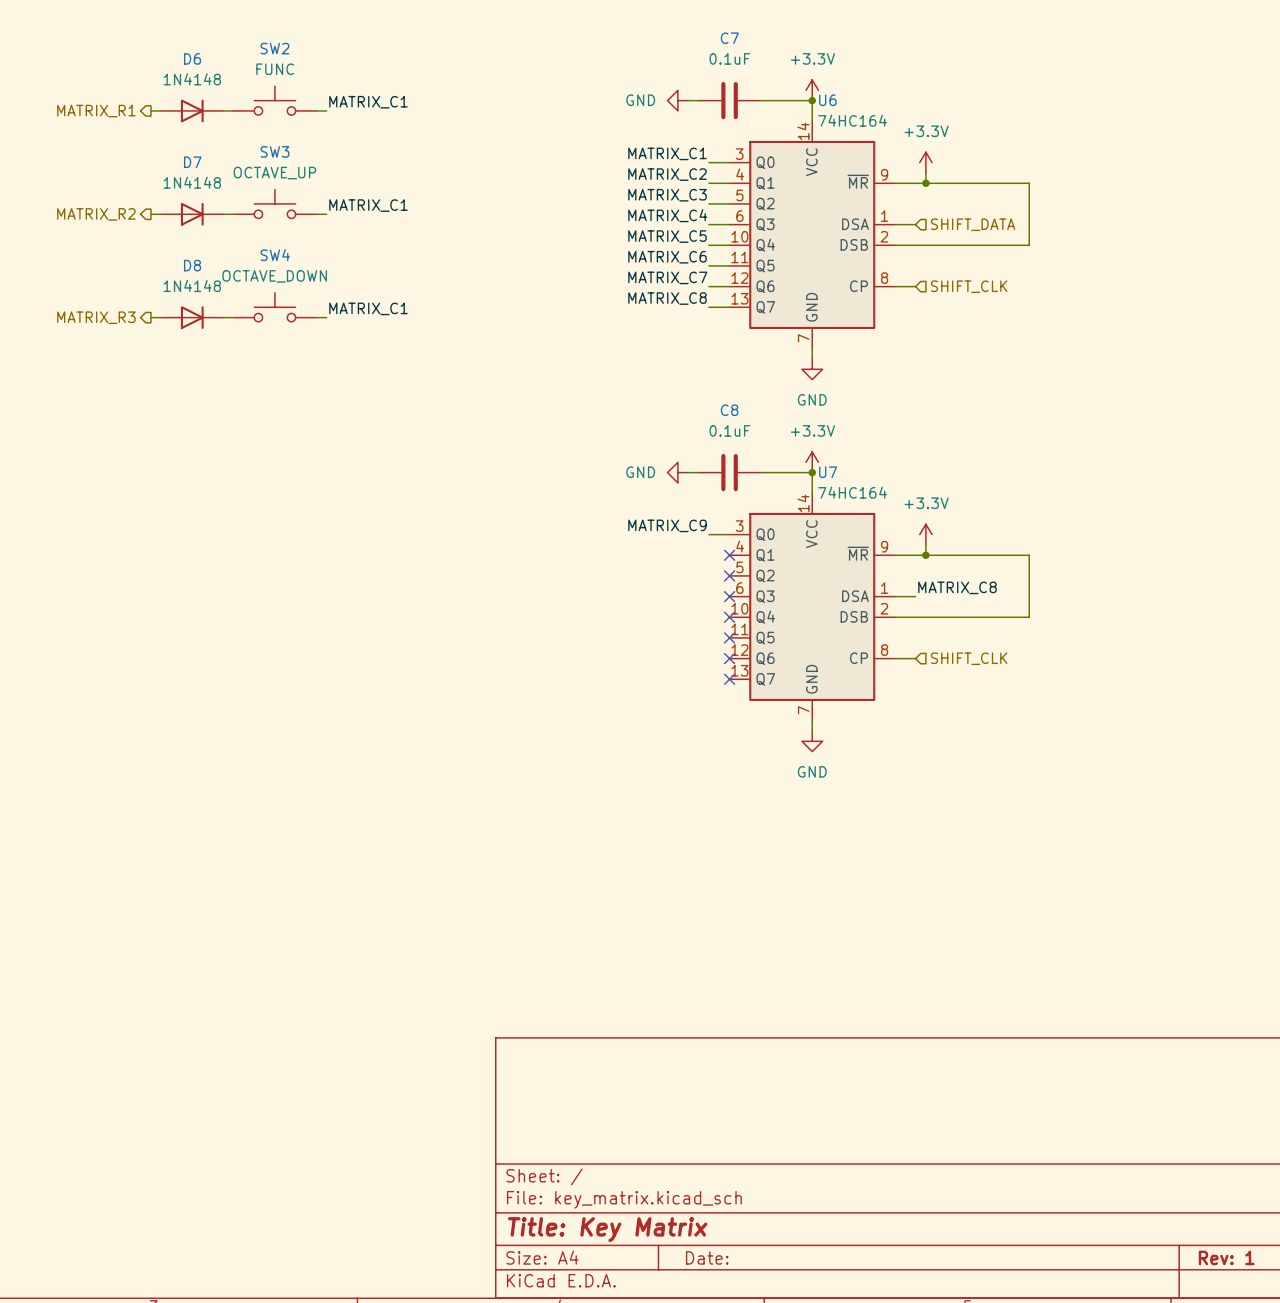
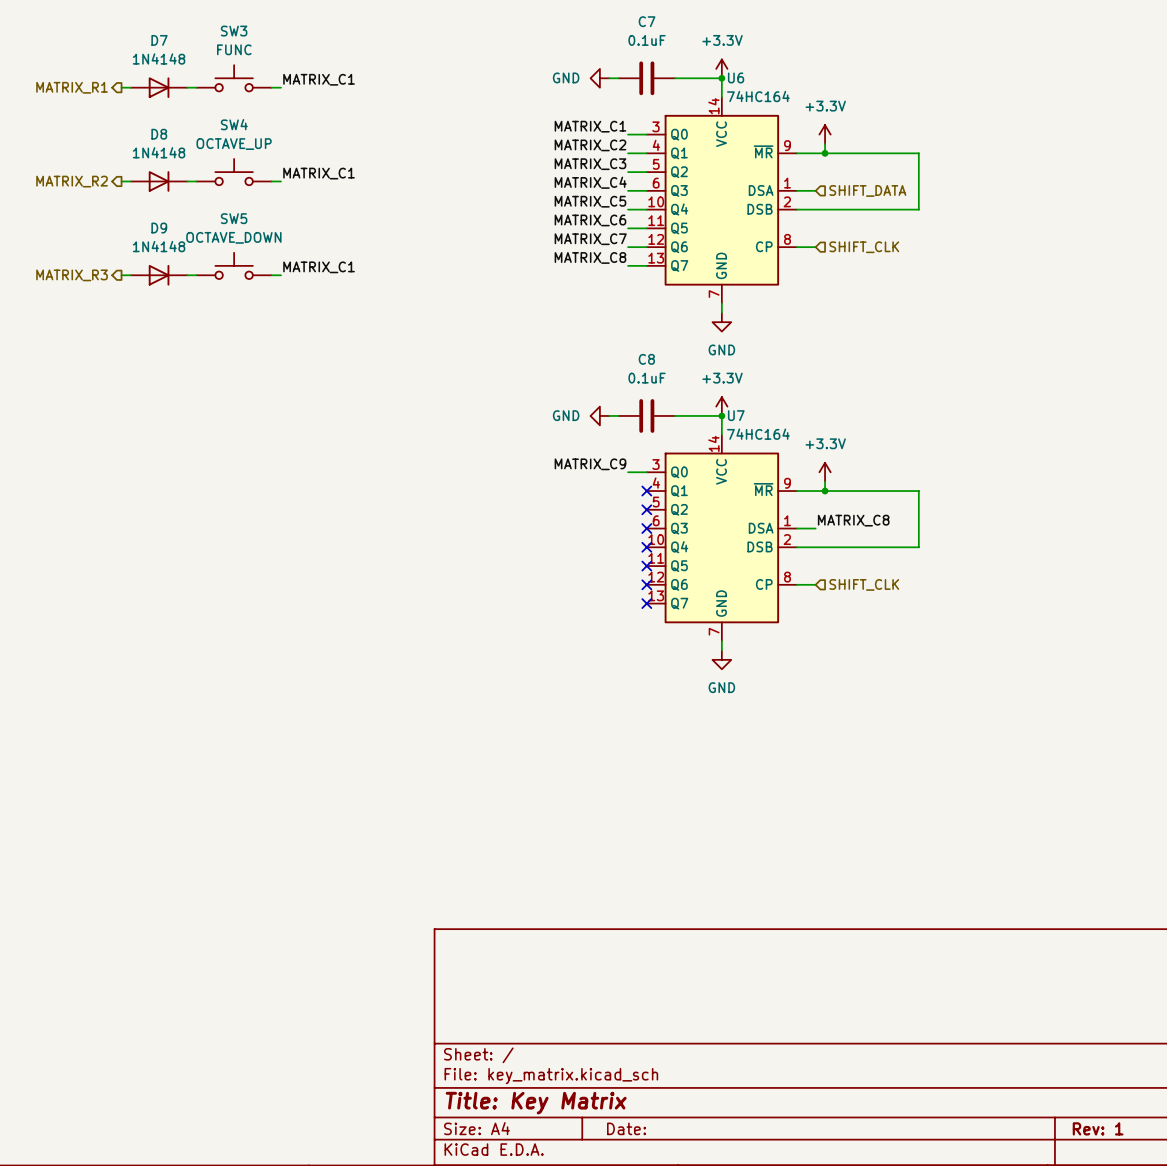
SW2 name: SW2 (274, 48) -> SW3 (234, 31)
D6 name: D6 (192, 58) -> D7 (159, 40)
SW3 name: SW3 (274, 151) -> SW4 (234, 124)
D7 name: D7 (192, 162) -> D8 (159, 134)
SW4 name: SW4 (275, 254) -> SW5 (234, 218)
D8 name: D8 (192, 265) -> D9 (159, 228)

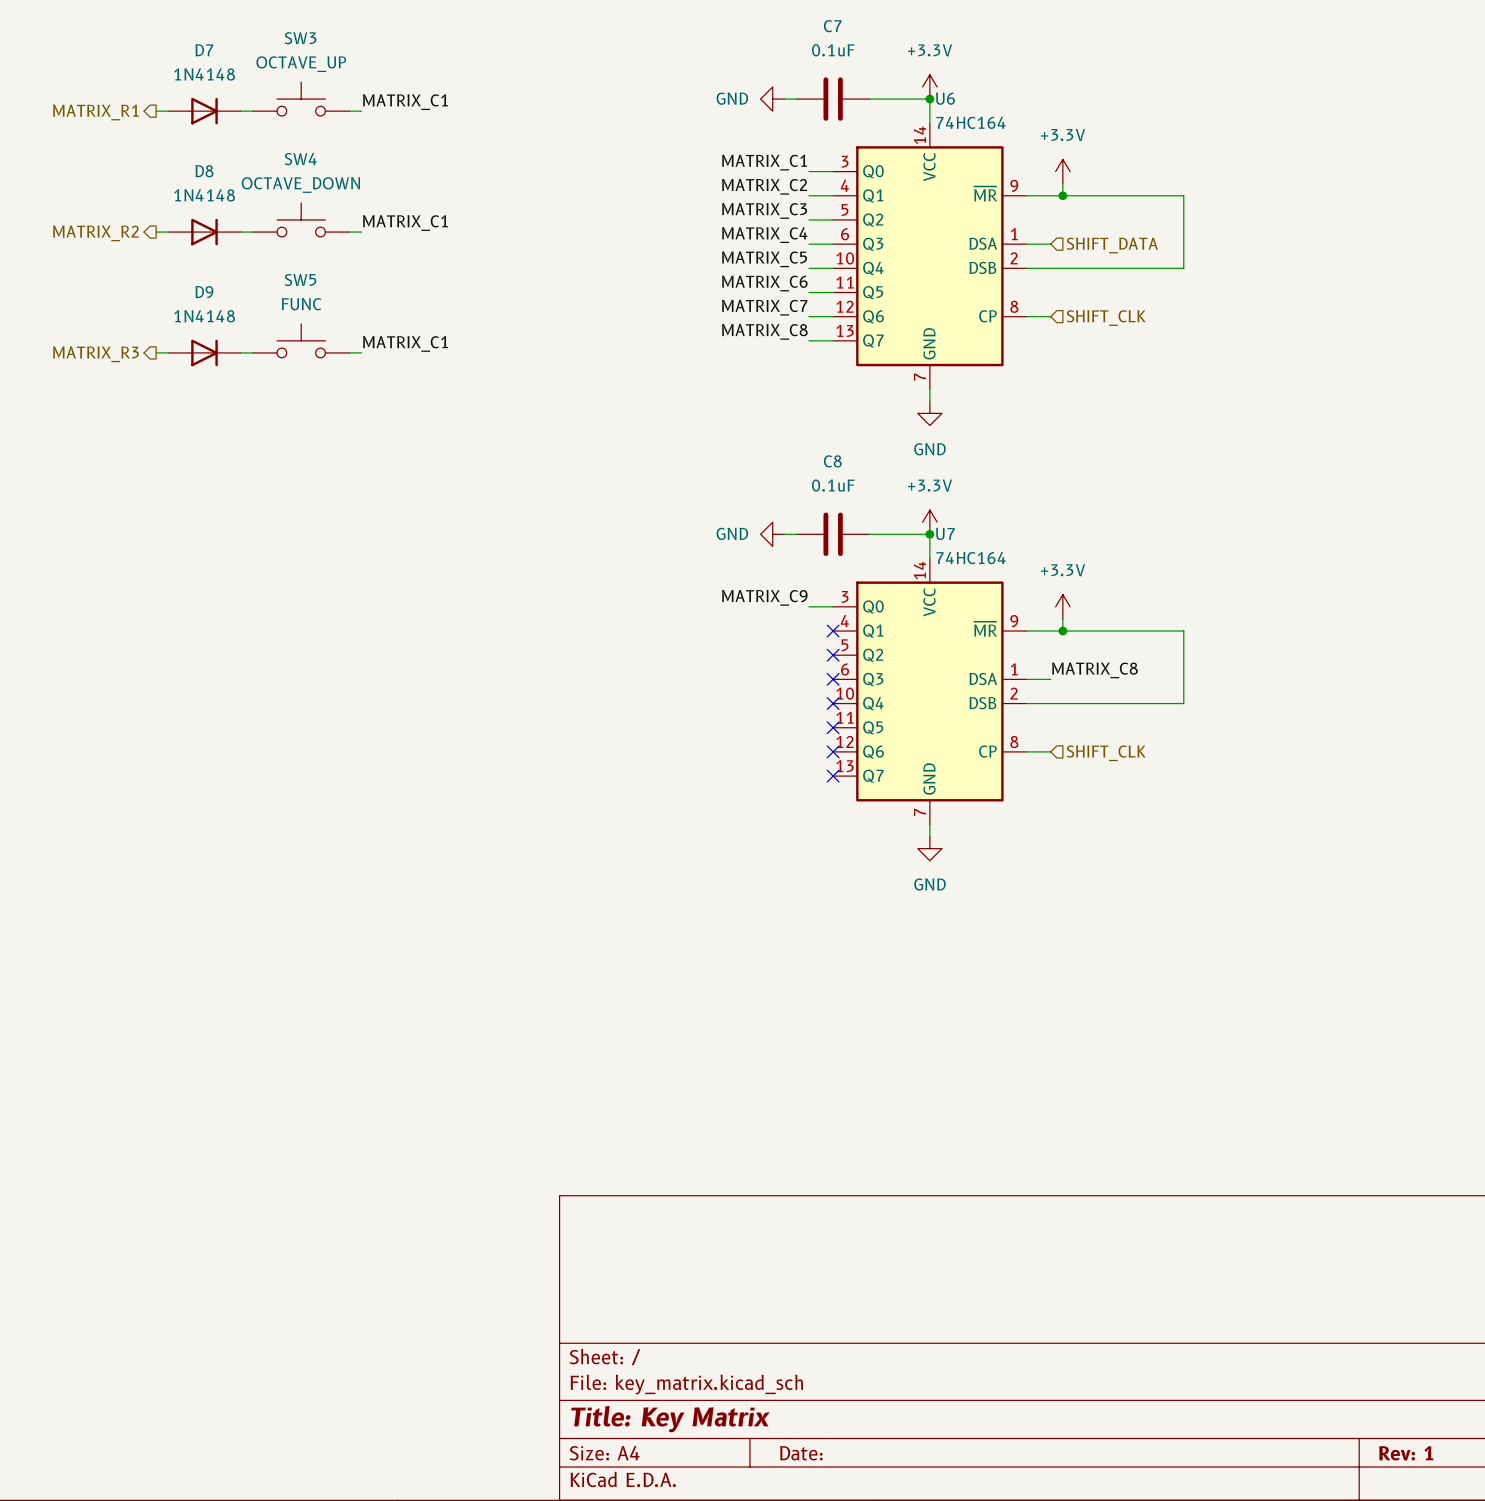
SW3 value: FUNC (234, 49) -> OCTAVE_UP (301, 64)
SW4 value: OCTAVE_UP (234, 144) -> OCTAVE_DOWN (300, 185)
SW5 value: OCTAVE_DOWN (233, 237) -> FUNC (301, 304)

